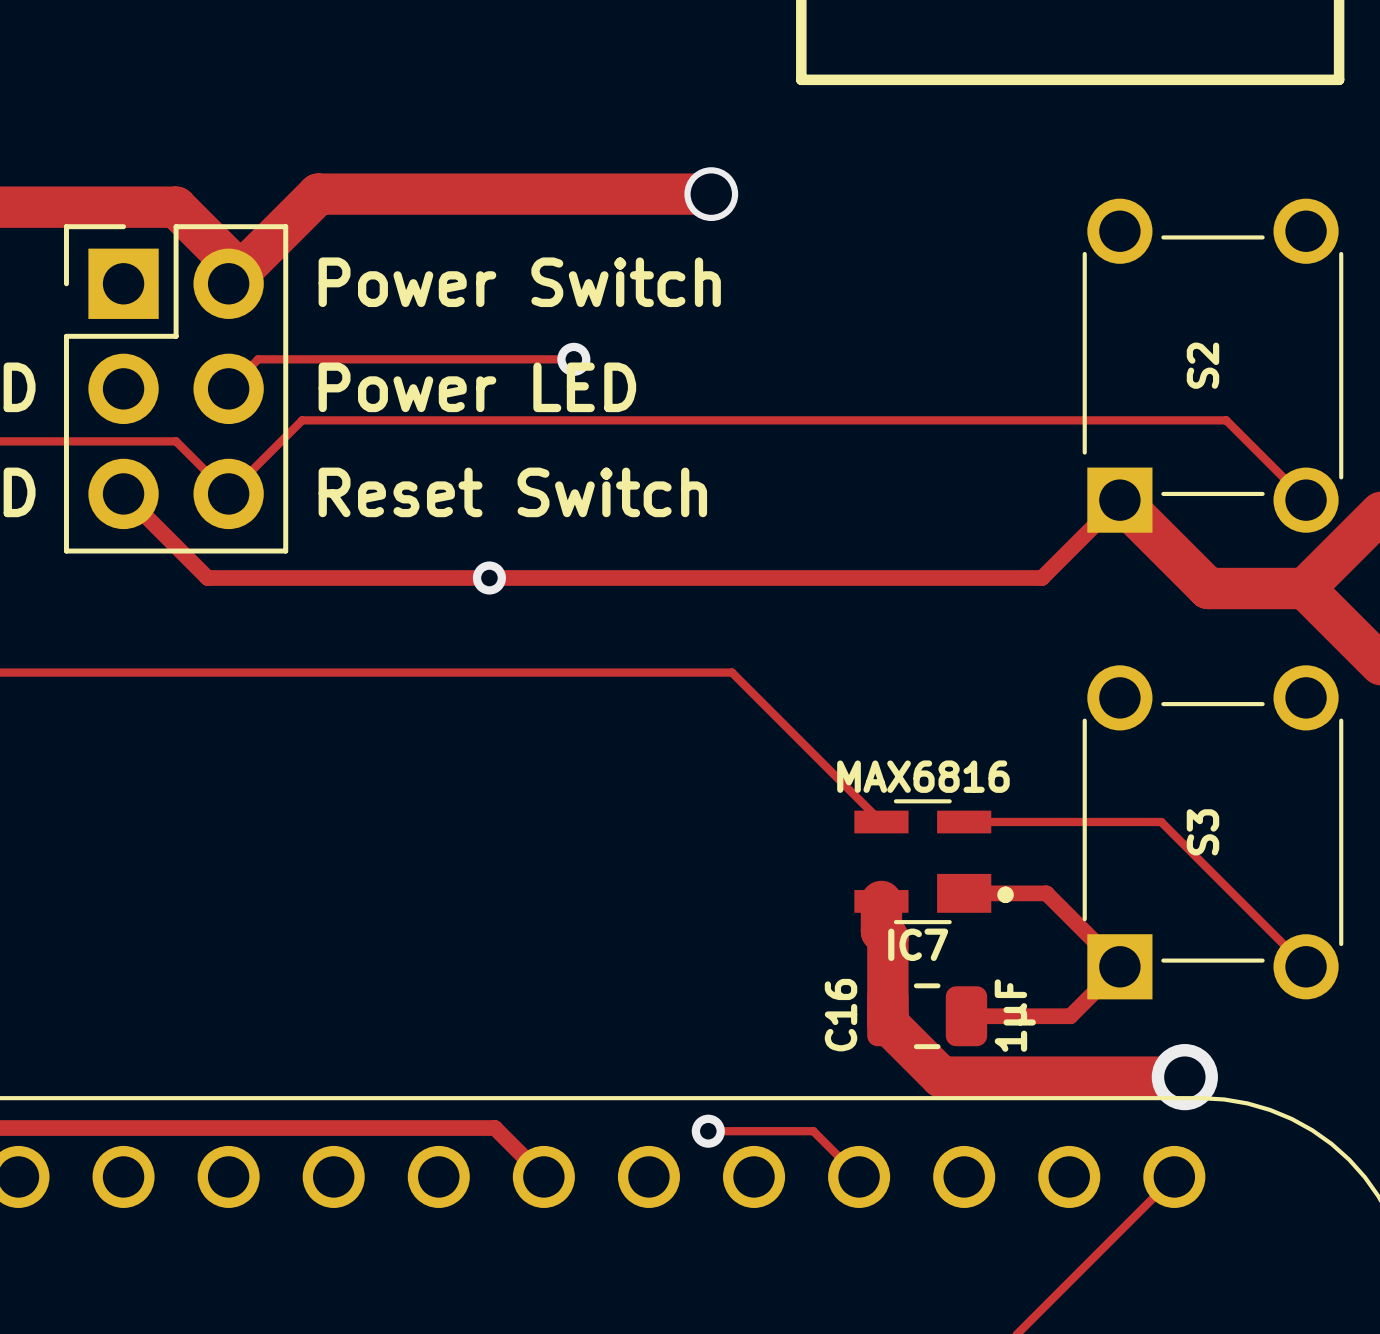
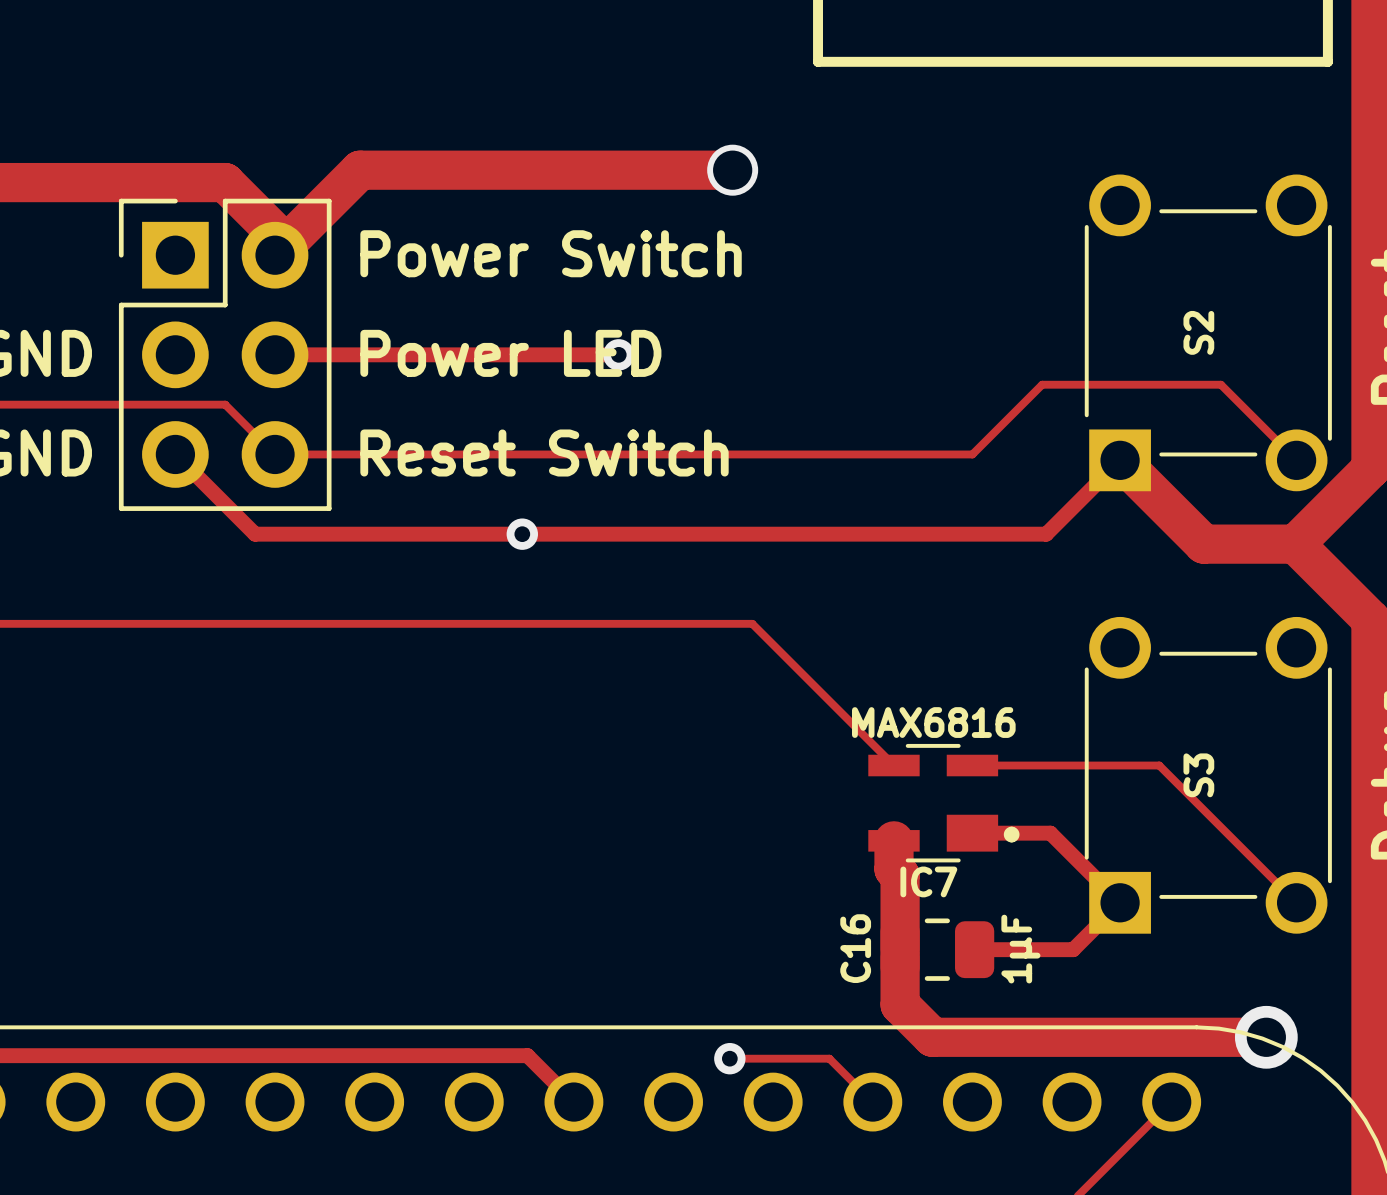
track: (573, 359) (258, 359) (228, 388) -> (618, 354) (275, 354)
via position: (573, 359) -> (618, 354)
track: (1037, 420) (302, 420) (228, 493) -> (1042, 384) (972, 454) (275, 454)
track: (887, 1016) (887, 1023) (941, 1077) (1184, 1077) -> none
track: none -> (900, 956) (900, 1004) (932, 1037) (1266, 1037)
via position: (1184, 1077) -> (1266, 1037)

